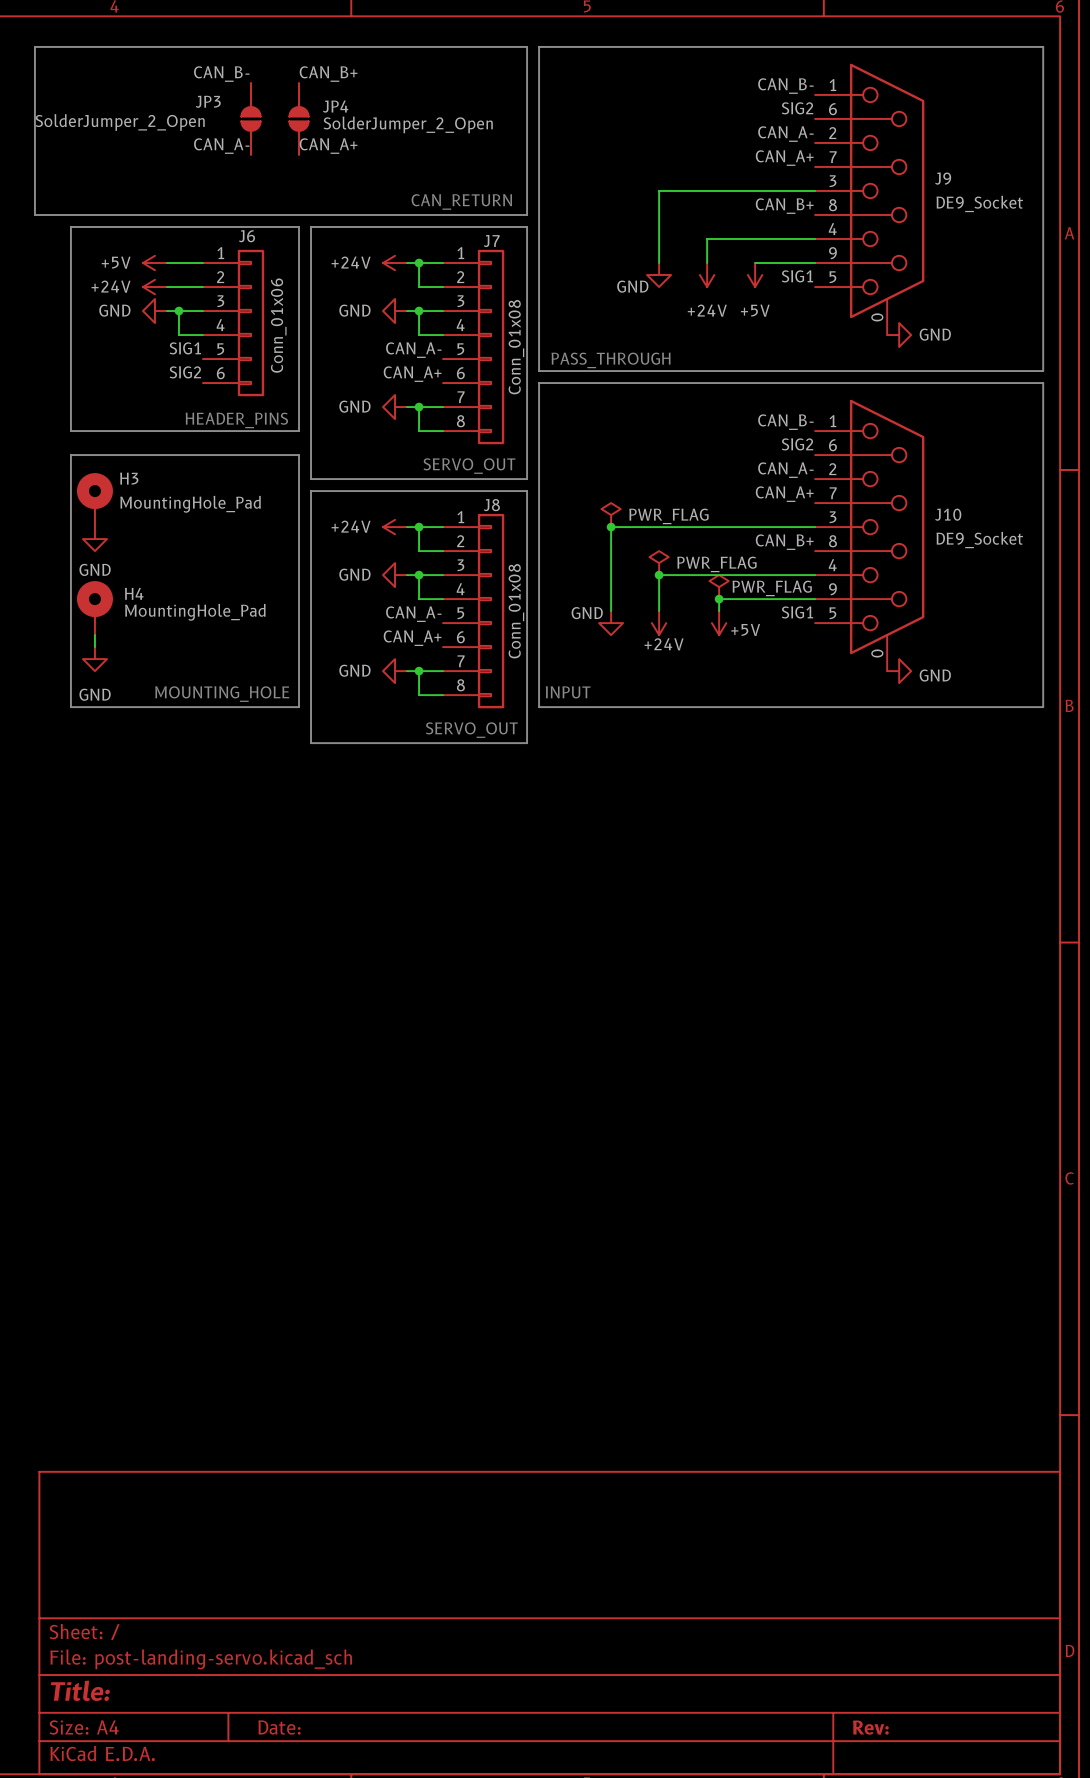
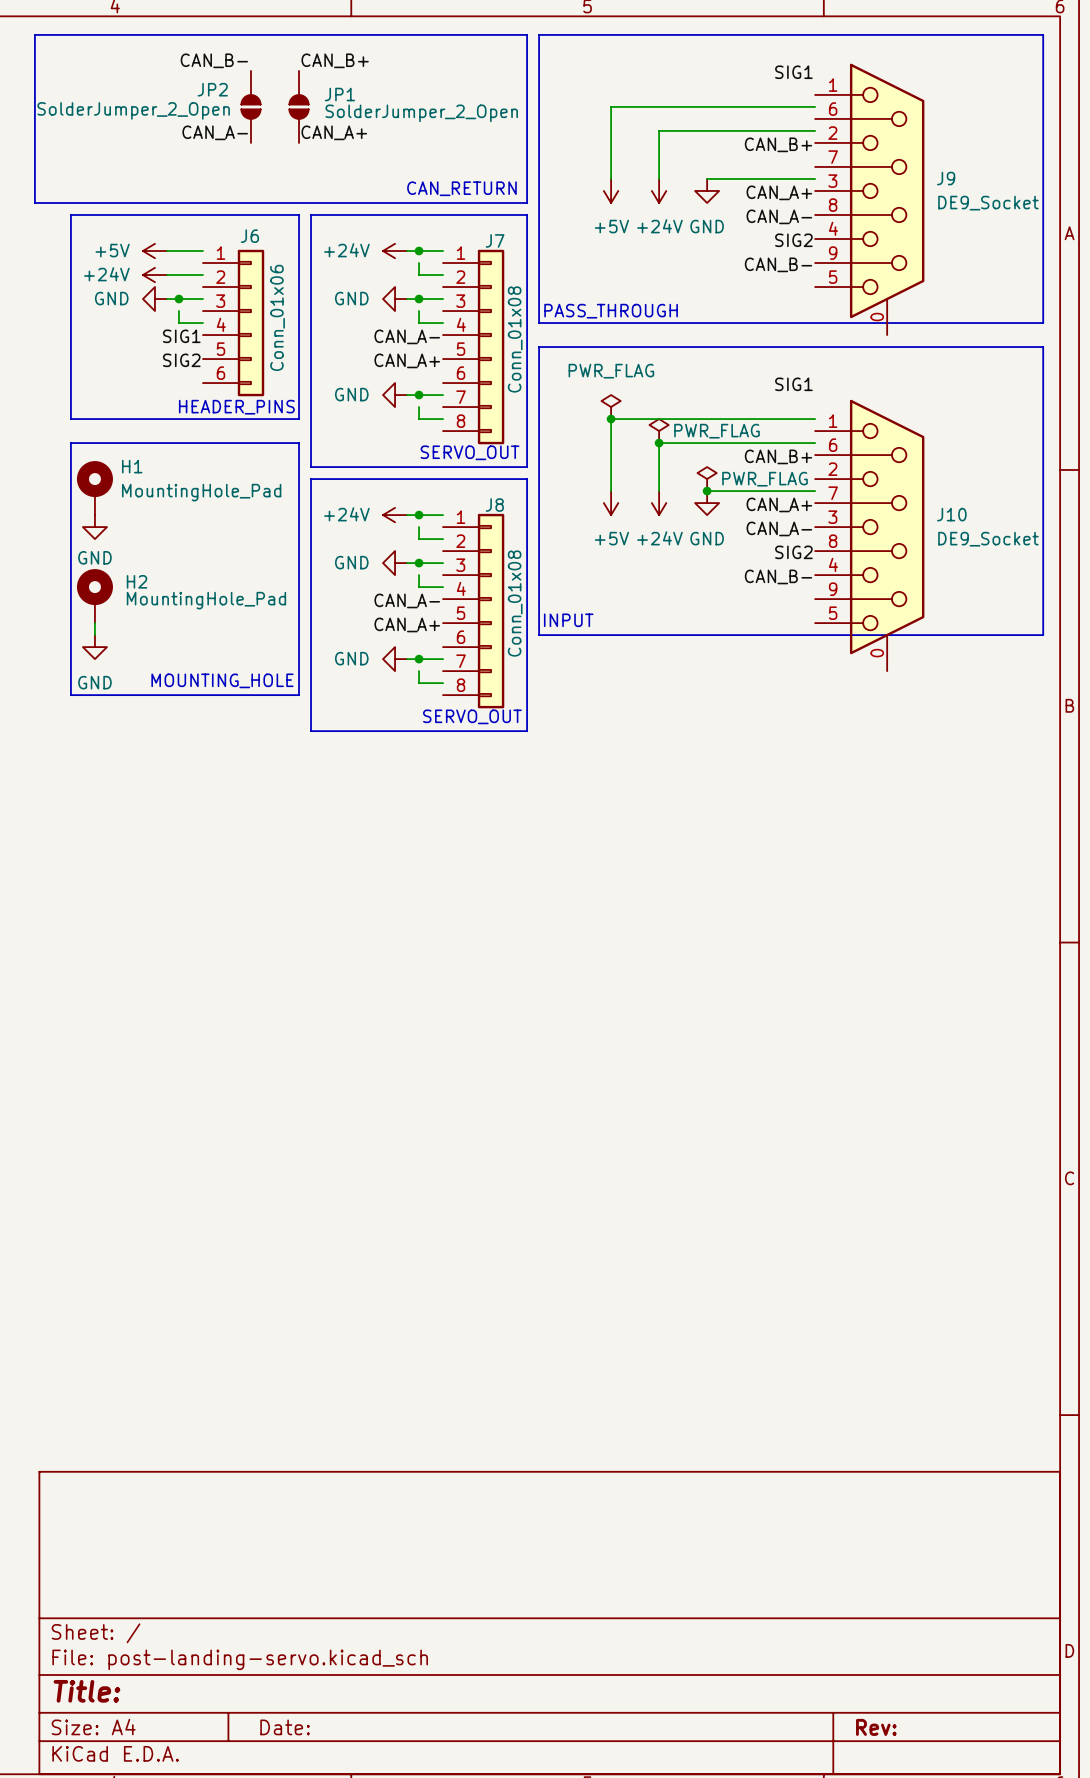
line: (34, 46) (527, 46) -> (34, 46) (34, 34) (527, 34) (527, 46)
line: (539, 46) (1043, 46) -> (539, 46) (539, 34) (1043, 34) (1043, 46)
label: none -> SIG1 (793, 72)
label position: CAN_B- (221, 74) -> CAN_B- (214, 60)
label position: CAN_B+ (328, 74) -> CAN_B+ (335, 60)
label: CAN_B- (785, 86) -> none
JP2: none -> SolderJumper_2_Open (251, 106)
JP1: none -> SolderJumper_2_Open (299, 106)
wire: none -> (815, 106) (611, 106) (611, 178)
label: SIG2 (797, 108) -> none
JP3: SolderJumper_2_Open (251, 118) -> none
JP4: SolderJumper_2_Open (299, 118) -> none
wire: none -> (815, 130) (659, 130) (659, 178)
label position: CAN_A- (785, 134) -> CAN_A- (779, 216)
label position: CAN_A- (221, 146) -> CAN_A- (215, 132)
label position: CAN_A+ (328, 146) -> CAN_A+ (334, 132)
label position: CAN_A+ (784, 158) -> CAN_A+ (779, 192)
wire: none -> (707, 178) (815, 178)
power symbol: none -> +5V (611, 190)
wire: (815, 190) (659, 190) (659, 263) -> none
text position: CAN_RETURN (461, 201) -> CAN_RETURN (461, 188)
line: (34, 202) (34, 214) (70, 214) -> (70, 226) (70, 214)
line: none -> (34, 202) (527, 202)
line: (527, 202) (527, 214) -> (527, 226) (527, 214)
label position: CAN_B+ (784, 206) -> CAN_B+ (778, 144)
line: (299, 214) (311, 214) -> (299, 214) (299, 226)
line: (70, 226) (299, 226) -> none
line: (311, 226) (527, 226) -> (311, 226) (311, 214)
wire: (815, 238) (707, 238) (707, 263) -> none
label: none -> SIG2 (793, 240)
power symbol position: +5V (154, 263) -> +5V (154, 251)
wire: (166, 263) (202, 263) -> (166, 251) (202, 251)
power symbol position: +24V (395, 263) -> +24V (395, 251)
wire: (407, 263) (443, 263) -> (407, 251) (443, 251)
junction position: (419, 263) -> (419, 251)
wire: (755, 263) (815, 263) -> none
label: none -> CAN_B- (778, 264)
wire: (419, 275) (419, 287) (443, 287) -> (419, 275) (443, 275)
power symbol position: GND (659, 275) -> GND (707, 190)
power symbol position: +24V (707, 275) -> +24V (659, 190)
power symbol: +5V (755, 275) -> none
label: SIG1 (797, 276) -> none
power symbol text position: GND (632, 286) -> GND (707, 226)
power symbol position: +24V (154, 287) -> +24V (154, 275)
wire: (166, 287) (202, 287) -> (166, 275) (202, 275)
power symbol position: GND (154, 311) -> GND (154, 299)
wire: (166, 311) (202, 311) -> (166, 299) (202, 299)
junction position: (178, 311) -> (178, 299)
power symbol position: GND (395, 311) -> GND (395, 299)
wire: (407, 311) (443, 311) -> (407, 299) (443, 299)
junction position: (419, 311) -> (419, 299)
wire: (178, 323) (178, 335) (202, 335) -> (178, 323) (202, 323)
wire: (419, 323) (419, 335) (443, 335) -> (419, 323) (443, 323)
line: (539, 323) (539, 347) -> (539, 323) (1043, 323)
line: (1043, 323) (1043, 347) -> (539, 347) (1043, 347)
power symbol: GND (899, 335) -> none
label position: SIG1 (185, 348) -> SIG1 (181, 336)
label position: CAN_A- (413, 350) -> CAN_A- (407, 336)
text position: PASS_THROUGH (610, 360) -> PASS_THROUGH (611, 311)
line: (539, 371) (1043, 371) -> (539, 371) (539, 383)
label position: SIG2 (185, 372) -> SIG2 (181, 360)
label position: CAN_A+ (412, 374) -> CAN_A+ (407, 360)
line: (539, 383) (1043, 383) -> (1043, 371) (1043, 383)
label: none -> SIG1 (793, 384)
power symbol position: GND (395, 407) -> GND (395, 395)
wire: (407, 407) (443, 407) -> (407, 395) (443, 395)
junction position: (419, 407) -> (419, 395)
power symbol: none -> PWR_FLAG (611, 407)
line: (70, 419) (70, 431) (299, 431) (299, 419) -> (70, 419) (299, 419)
wire: (419, 419) (419, 431) (443, 431) -> (419, 419) (443, 419)
junction: none -> (611, 419)
wire: none -> (815, 419) (611, 419) (611, 491)
text position: HEADER_PINS (236, 420) -> HEADER_PINS (236, 407)
label: CAN_B- (785, 422) -> none
power symbol: none -> PWR_FLAG (659, 431)
junction: none -> (659, 443)
wire: none -> (815, 443) (659, 443) (659, 491)
label: SIG2 (797, 444) -> none
line: (70, 455) (299, 455) -> (70, 455) (70, 443) (299, 443) (299, 455)
text position: SERVO_OUT (469, 466) -> SERVO_OUT (470, 452)
line: (311, 467) (311, 479) -> (311, 491) (311, 479)
line: (527, 467) (527, 479) -> (527, 491) (527, 479)
label position: CAN_A- (785, 470) -> CAN_A- (779, 528)
power symbol: none -> PWR_FLAG (707, 479)
H1: none -> MountingHole_Pad (94, 488)
line: (311, 491) (527, 491) -> (311, 467) (527, 467)
wire: none -> (707, 491) (815, 491)
junction: none -> (707, 491)
label position: CAN_A+ (784, 494) -> CAN_A+ (779, 504)
H3: MountingHole_Pad (94, 500) -> none
power symbol: none -> +5V (611, 503)
power symbol: none -> +24V (659, 503)
power symbol: none -> GND (707, 503)
power symbol: PWR_FLAG (611, 515) -> none
power symbol position: +24V (395, 527) -> +24V (395, 515)
wire: (407, 527) (443, 527) -> (407, 515) (443, 515)
junction position: (419, 527) -> (419, 515)
junction: (611, 527) -> none
wire: (815, 527) (611, 527) (611, 611) -> none
power symbol position: GND (94, 539) -> GND (94, 527)
wire: (419, 539) (419, 551) (443, 551) -> (419, 539) (443, 539)
label position: CAN_B+ (784, 542) -> CAN_B+ (778, 456)
label: none -> SIG2 (793, 552)
power symbol: PWR_FLAG (659, 563) -> none
power symbol position: GND (395, 575) -> GND (395, 563)
wire: (407, 575) (443, 575) -> (407, 563) (443, 563)
junction position: (419, 575) -> (419, 563)
junction: (659, 575) -> none
wire: (815, 575) (659, 575) (659, 611) -> none
label: none -> CAN_B- (778, 576)
wire: (419, 587) (419, 599) (443, 599) -> (419, 587) (443, 587)
power symbol: PWR_FLAG (719, 587) -> none
H2: none -> MountingHole_Pad (94, 596)
junction: (719, 599) -> none
wire: (815, 599) (719, 599) (719, 611) -> none
H4: MountingHole_Pad (94, 608) -> none
label: SIG1 (797, 612) -> none
label position: CAN_A- (413, 614) -> CAN_A- (407, 600)
power symbol: GND (611, 623) -> none
power symbol: +24V (659, 623) -> none
power symbol: +5V (719, 623) -> none
line: (539, 635) (539, 707) (1043, 707) (1043, 635) -> (539, 635) (1043, 635)
label position: CAN_A+ (412, 638) -> CAN_A+ (407, 624)
power symbol position: GND (94, 659) -> GND (94, 647)
power symbol position: GND (395, 671) -> GND (395, 659)
wire: (407, 671) (443, 671) -> (407, 659) (443, 659)
junction position: (419, 671) -> (419, 659)
power symbol: GND (899, 671) -> none
wire: (419, 683) (419, 695) (443, 695) -> (419, 683) (443, 683)
text position: INPUT (568, 692) -> INPUT (568, 620)
text position: MOUNTING_HOLE (222, 694) -> MOUNTING_HOLE (222, 680)
line: (70, 695) (70, 707) (299, 707) (299, 695) -> (70, 695) (299, 695)
text position: SERVO_OUT (471, 730) -> SERVO_OUT (472, 716)
line: (311, 731) (311, 743) (527, 743) (527, 731) -> (311, 731) (527, 731)

